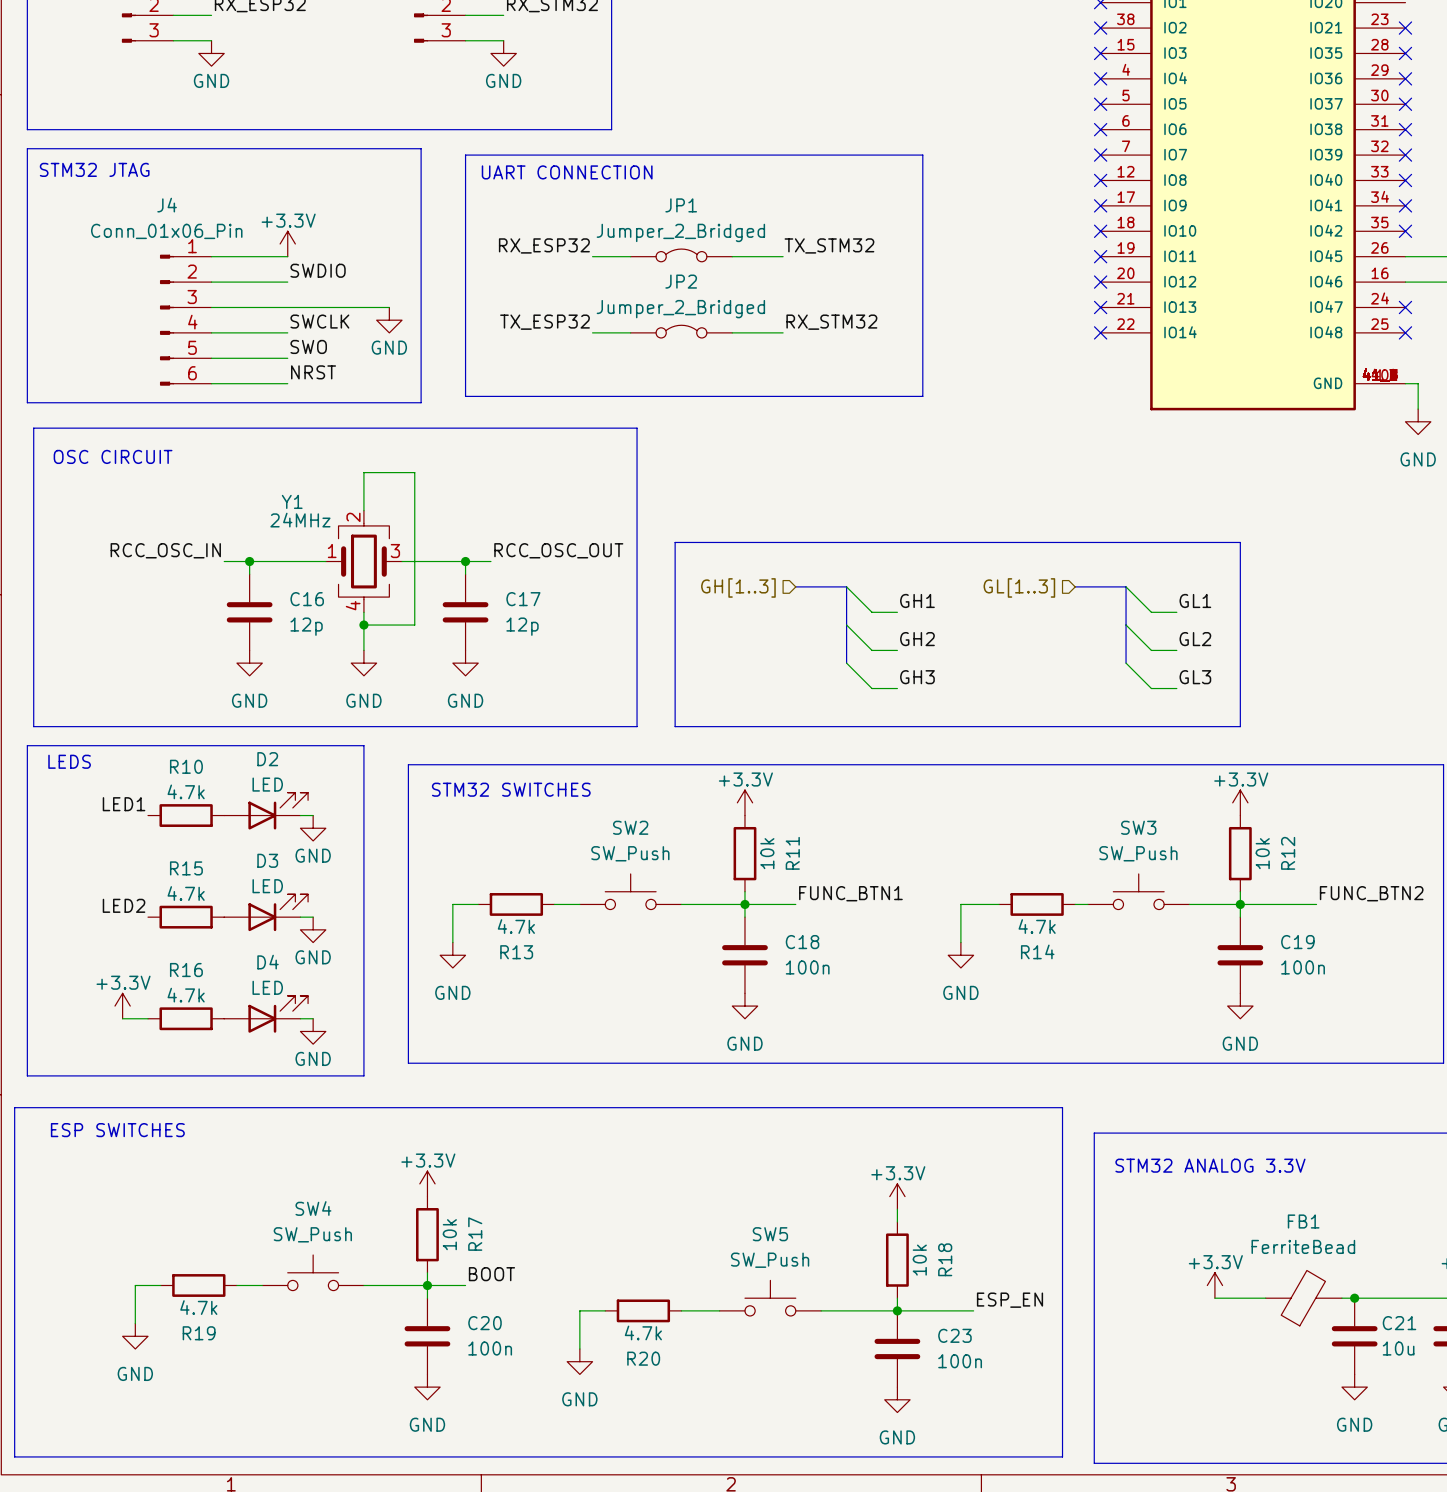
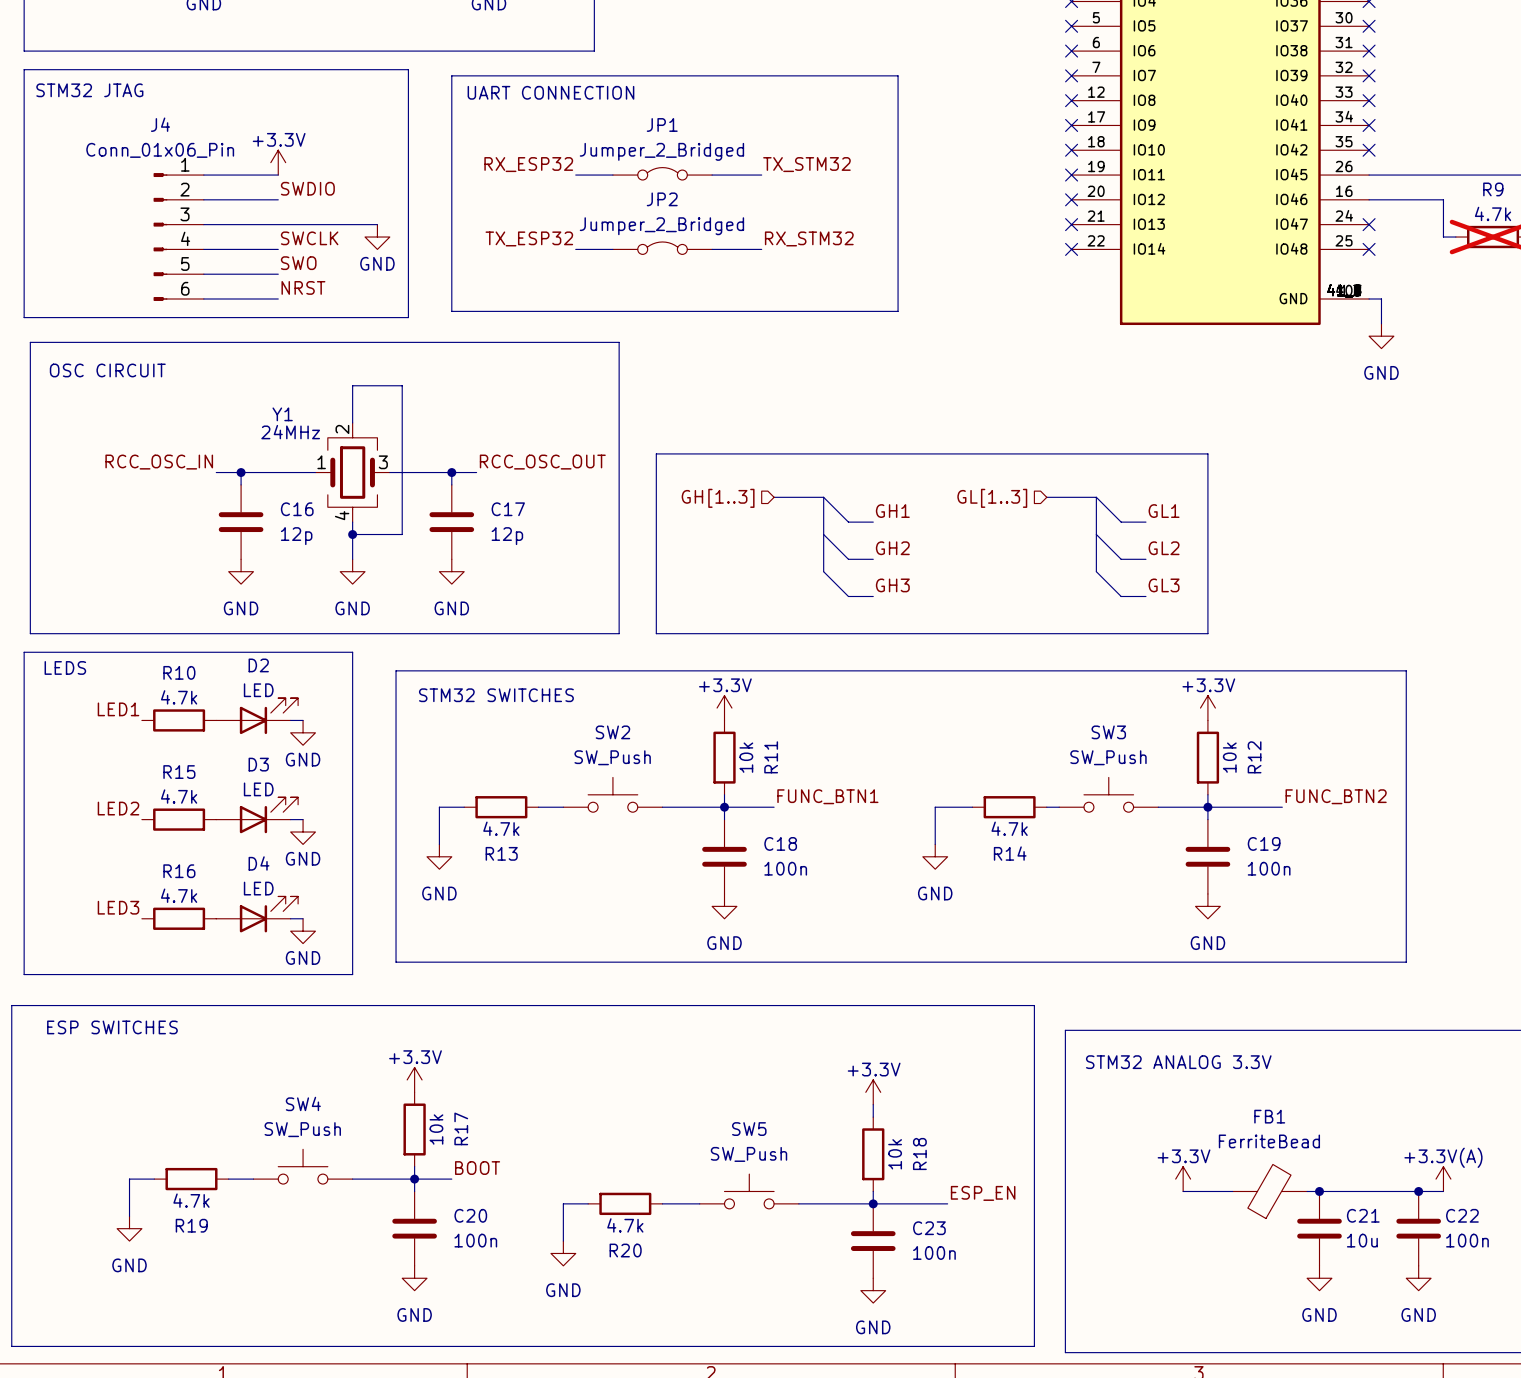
power symbol: +3.3V (122, 1006) -> none
label: none -> LED3 (118, 907)
wire: (122, 1018) (148, 1018) -> none

